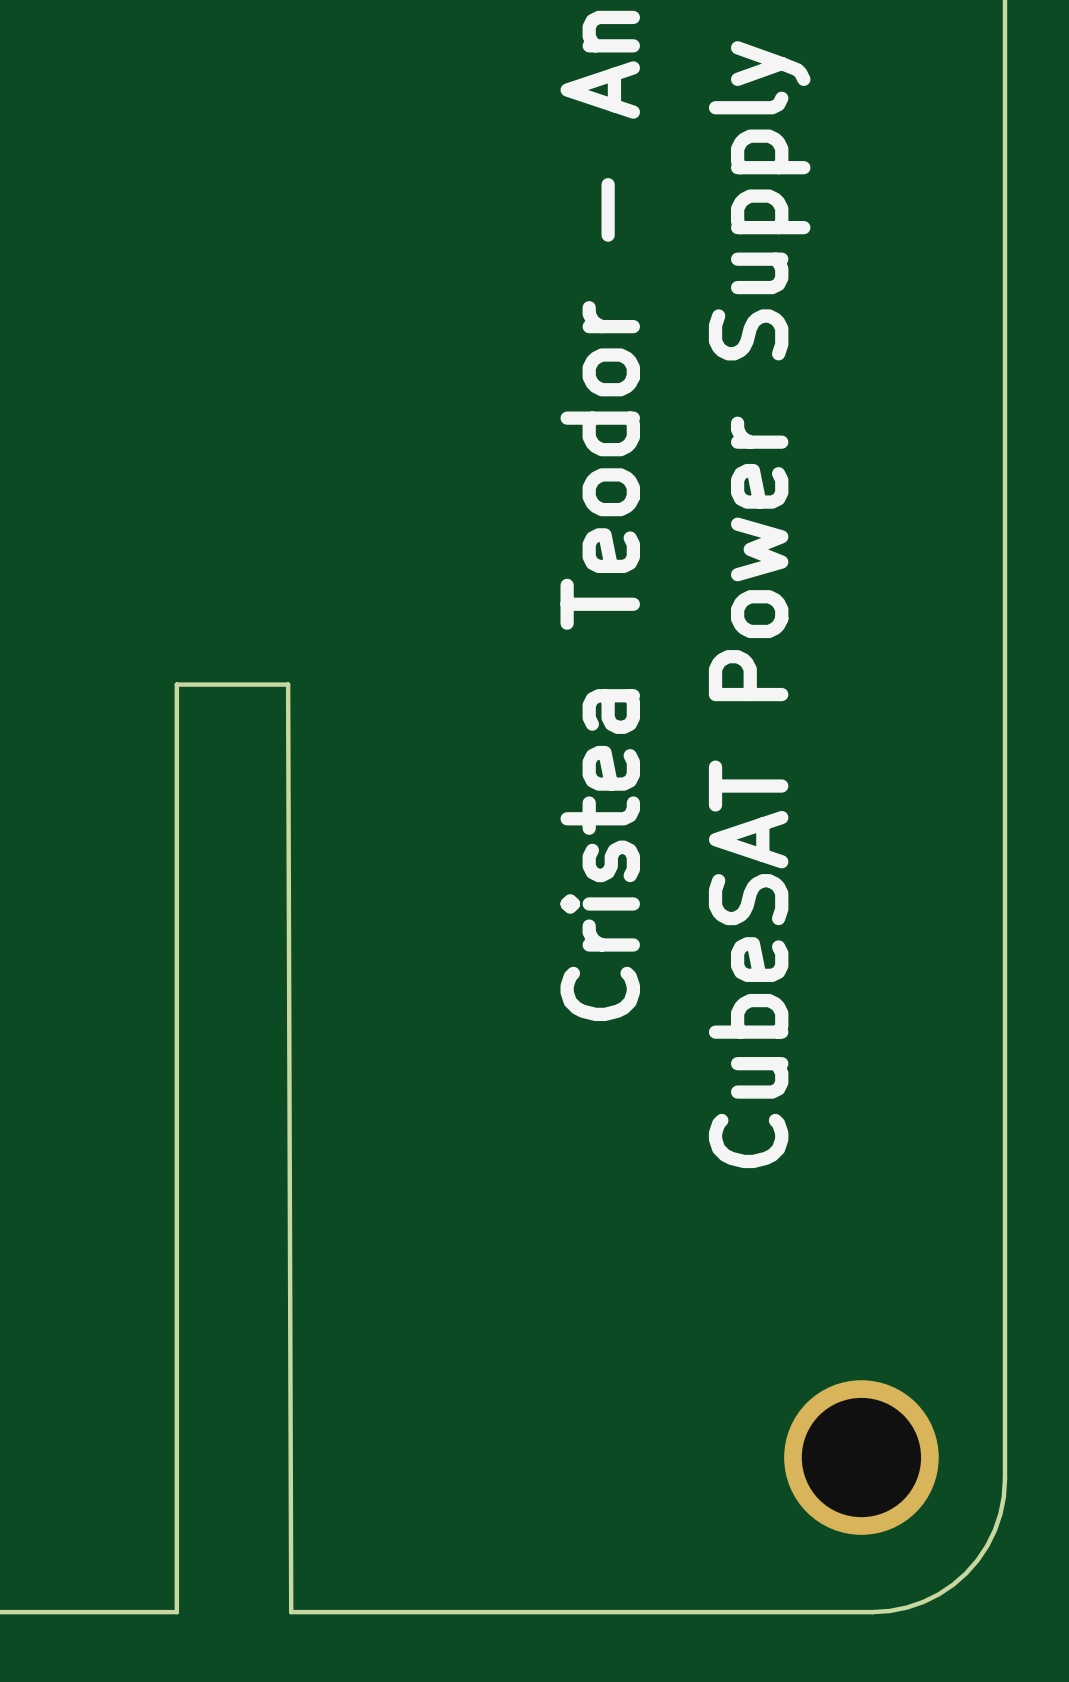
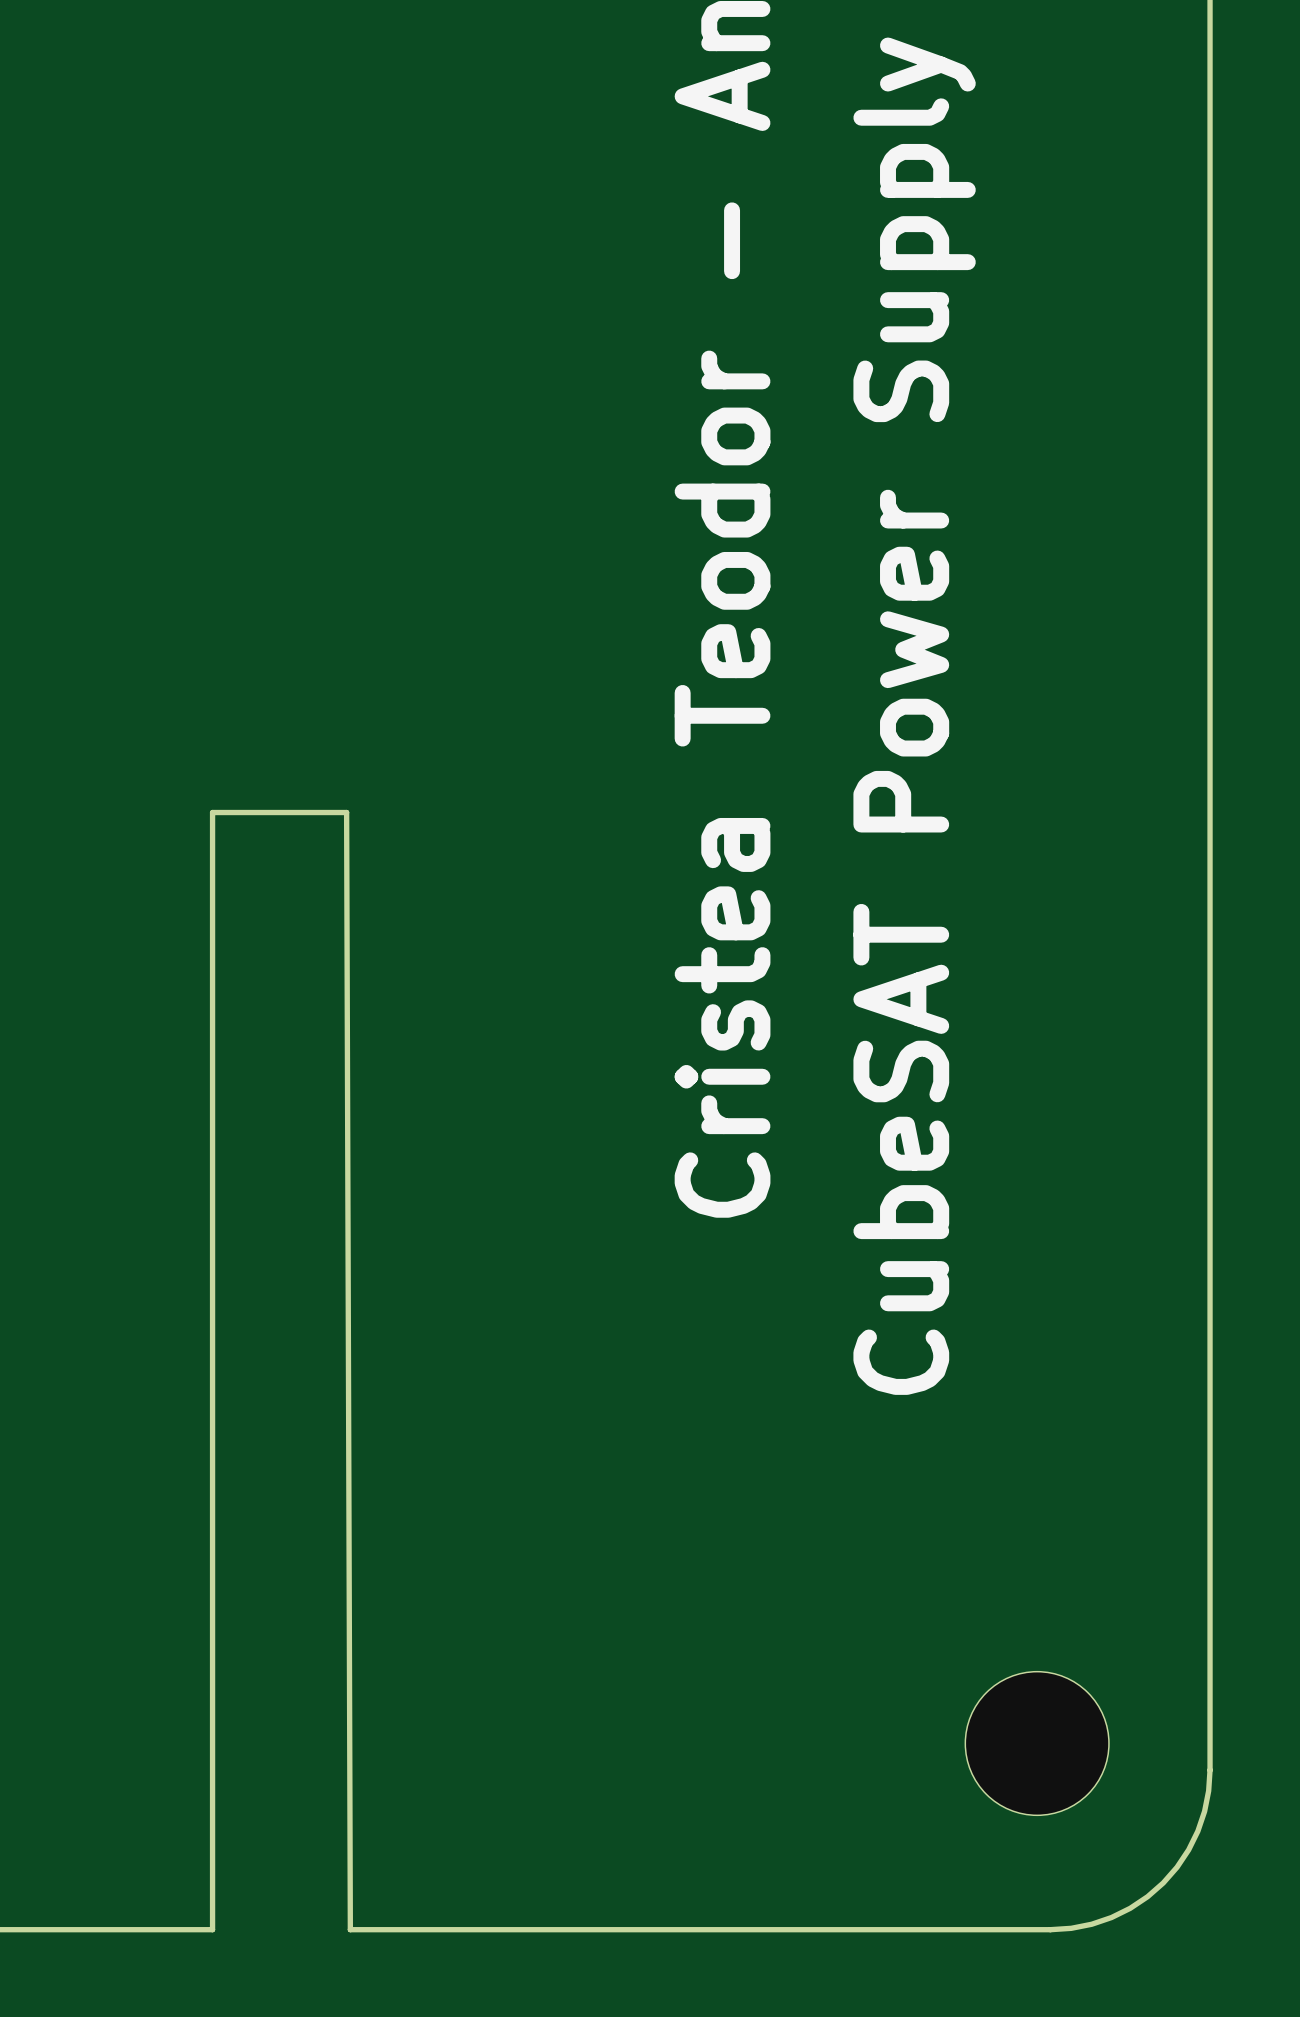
part footprint: [784, 1380, 939, 1535] -> [965, 1671, 1109, 1816]

